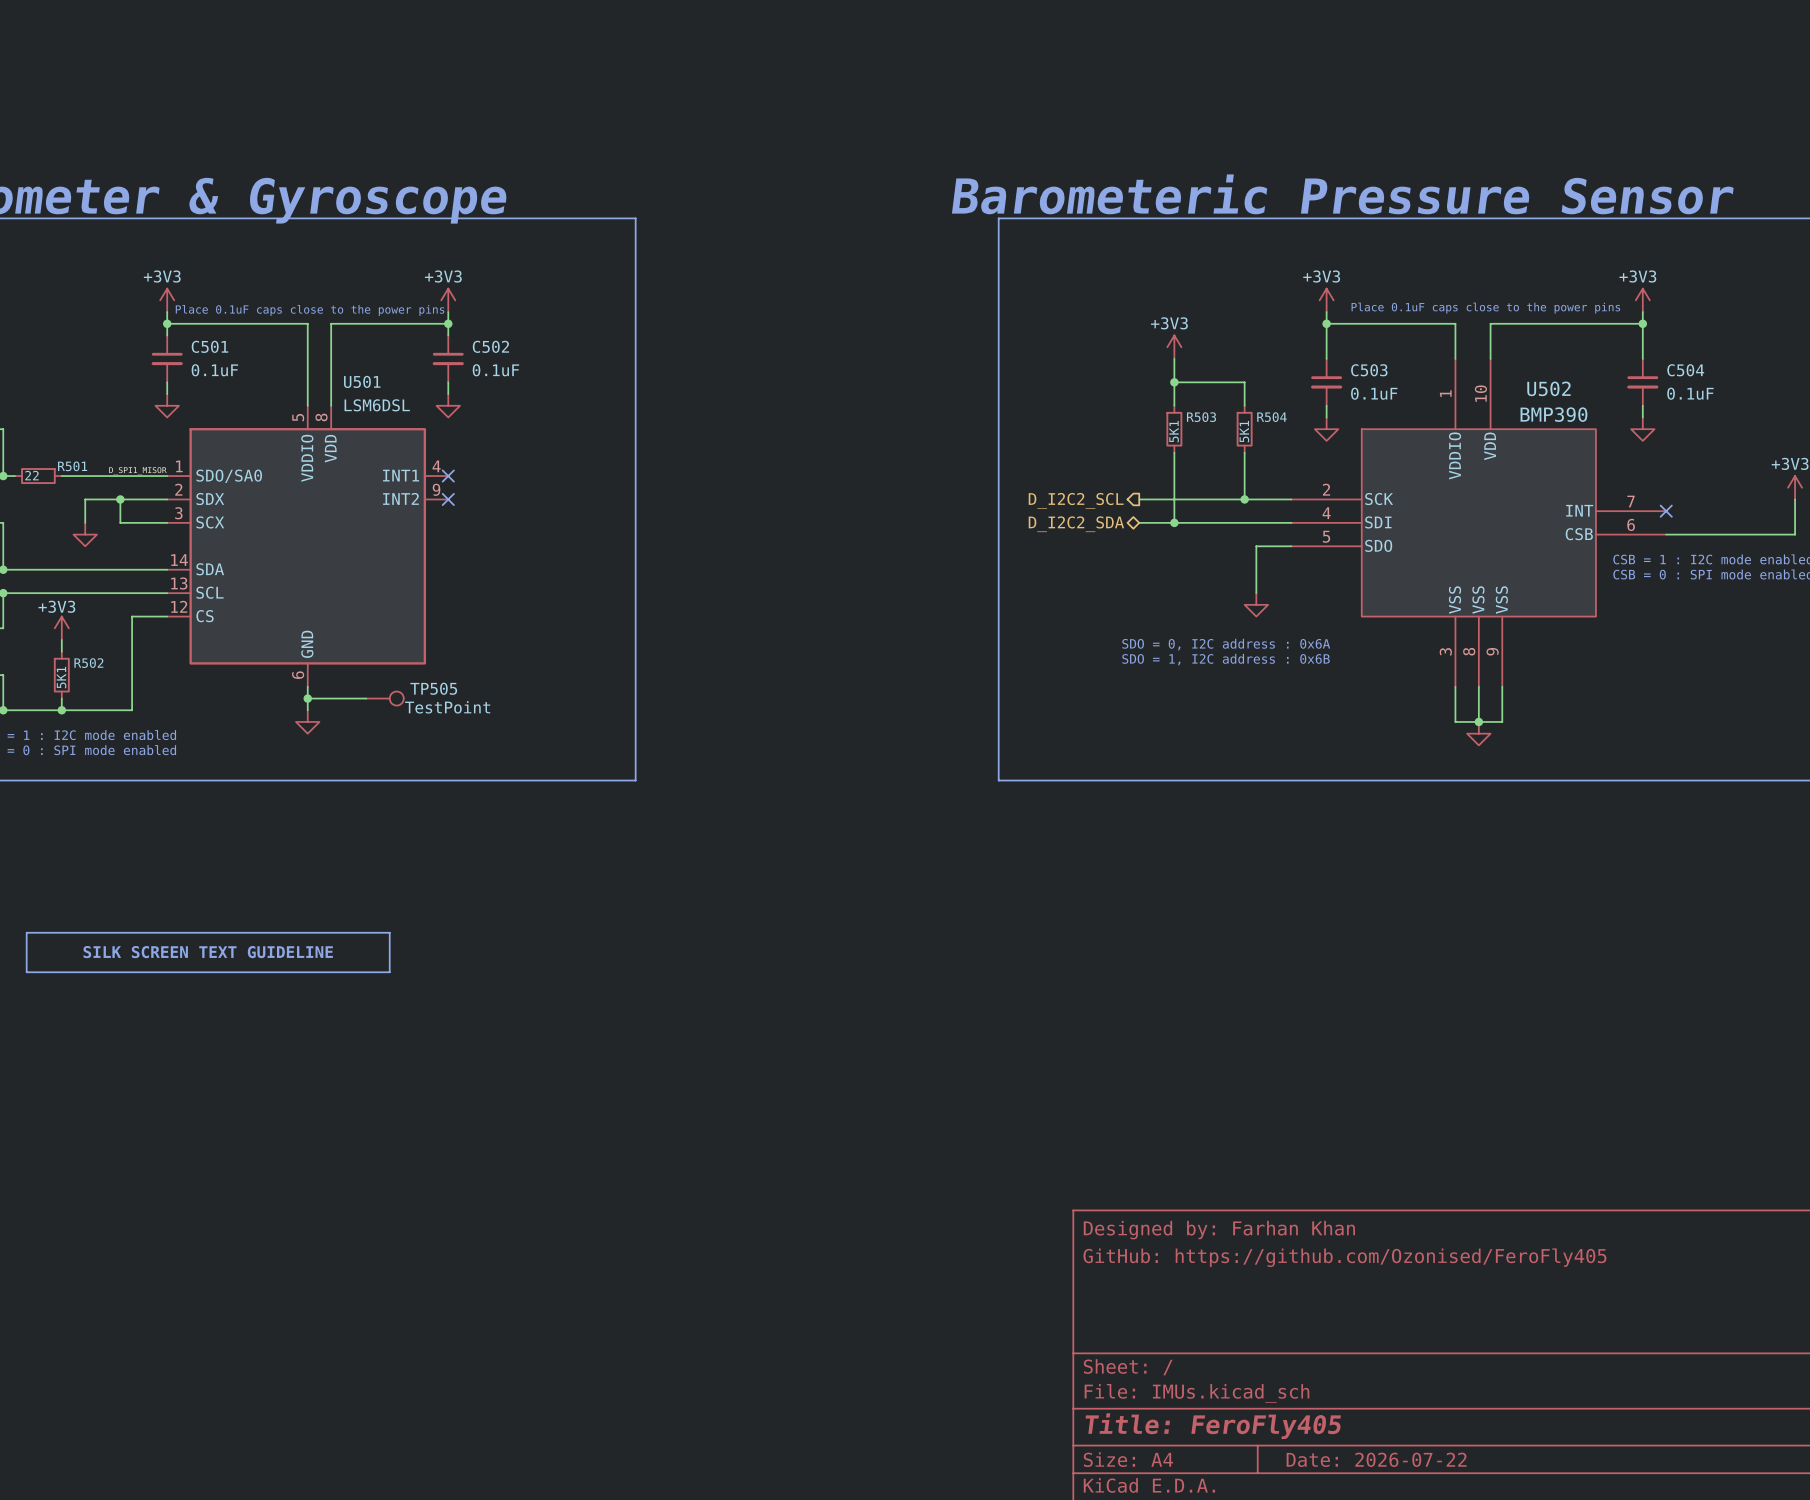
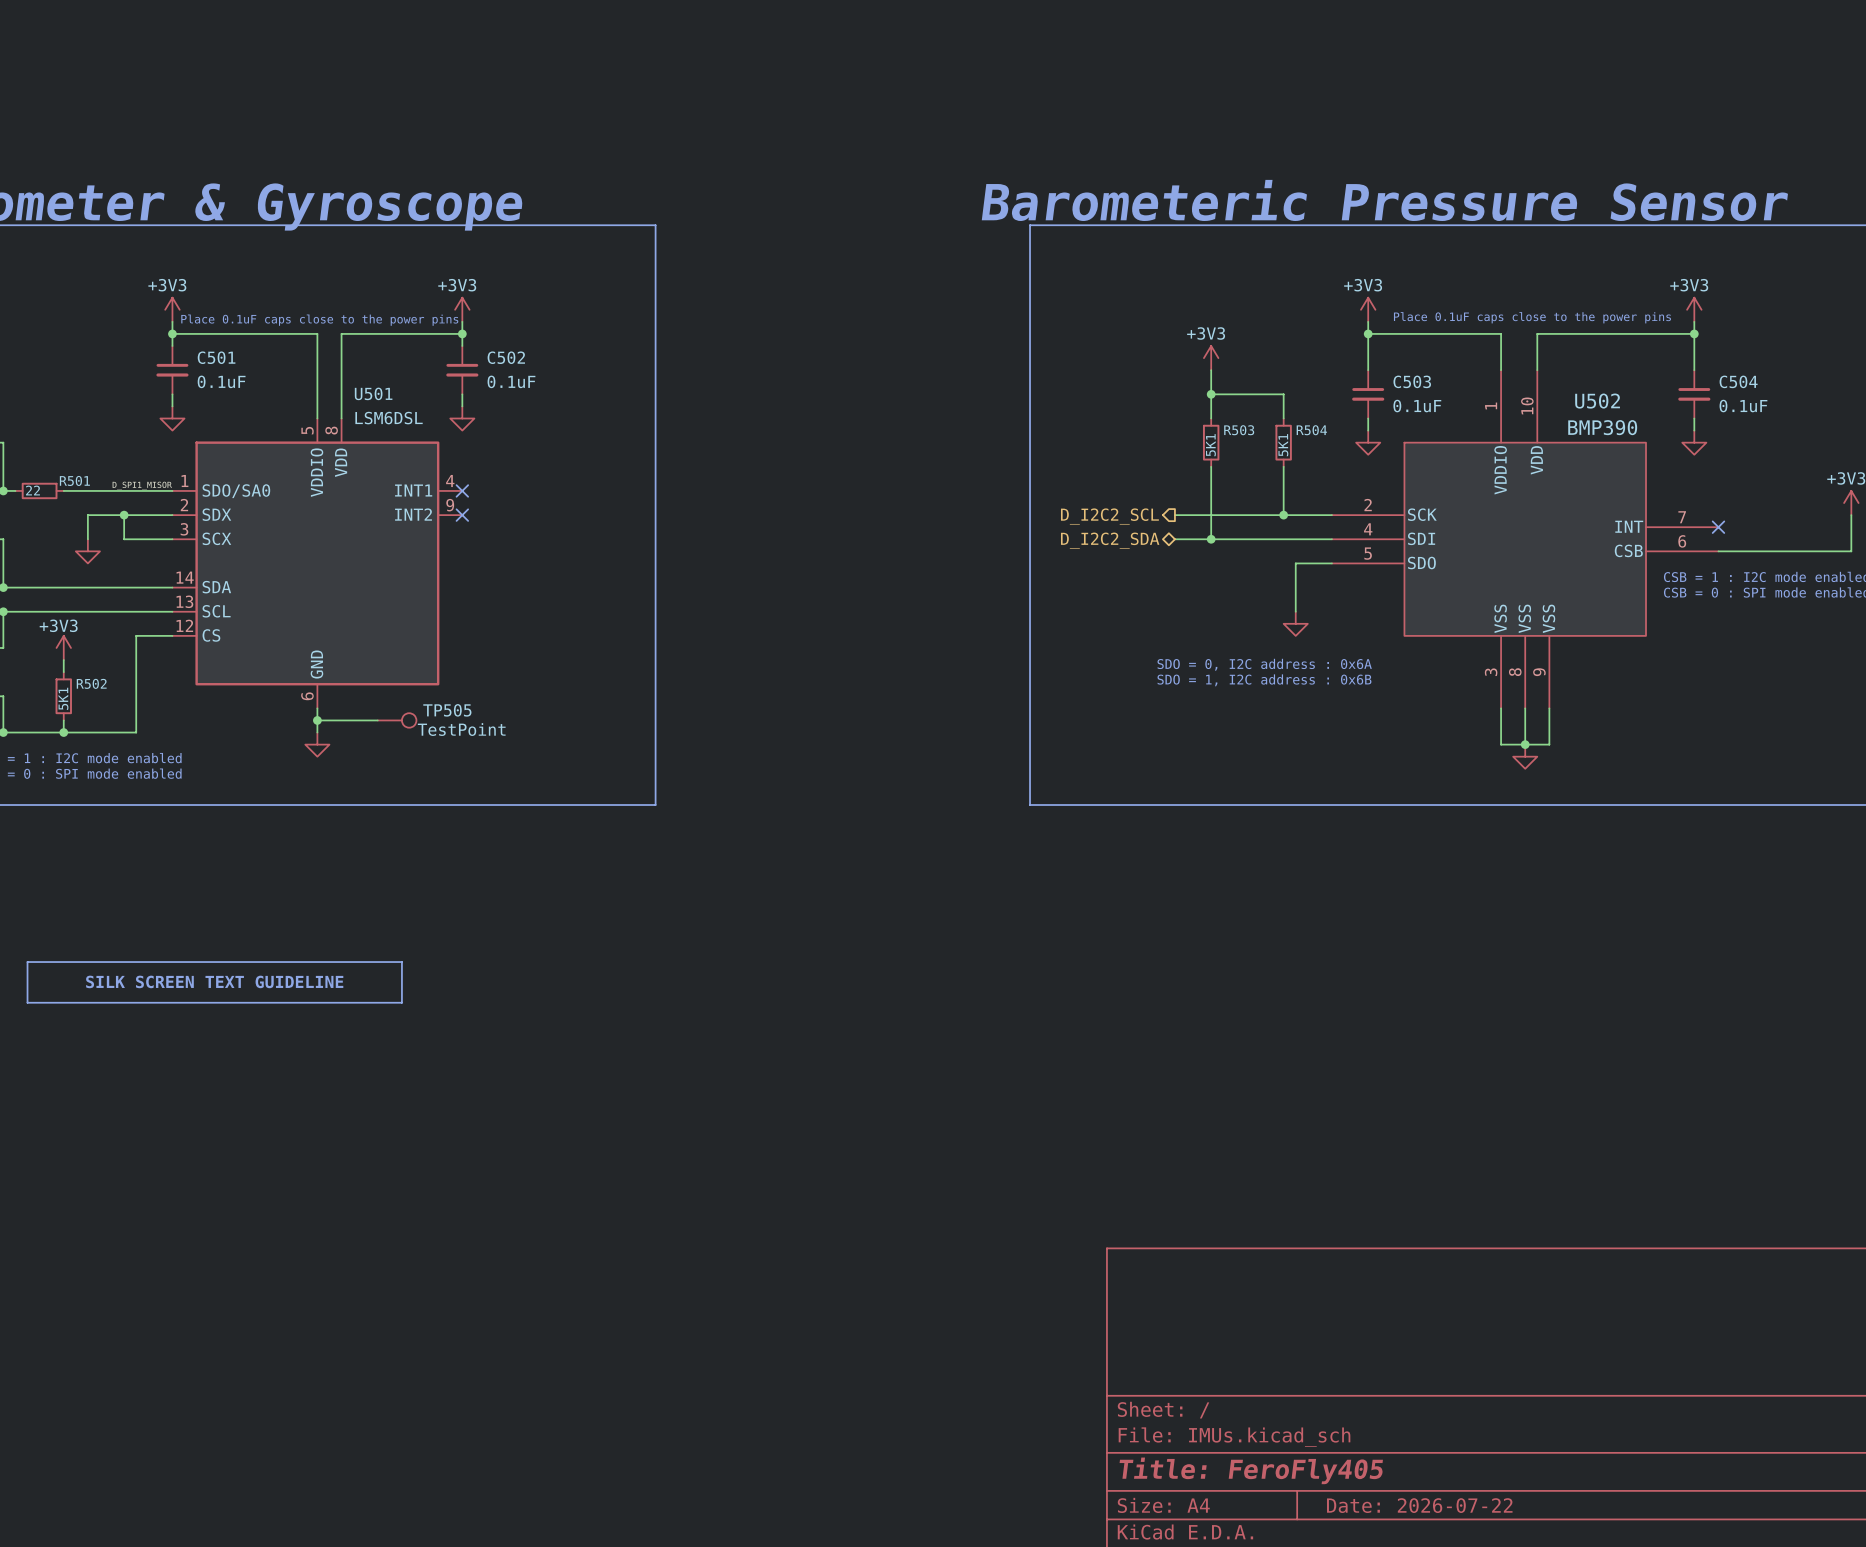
title block: Designed by: Farhan Khan (1219, 1230) -> none
title block: GitHub: https://github.com/Ozonised/FeroFly405 (1344, 1257) -> none

